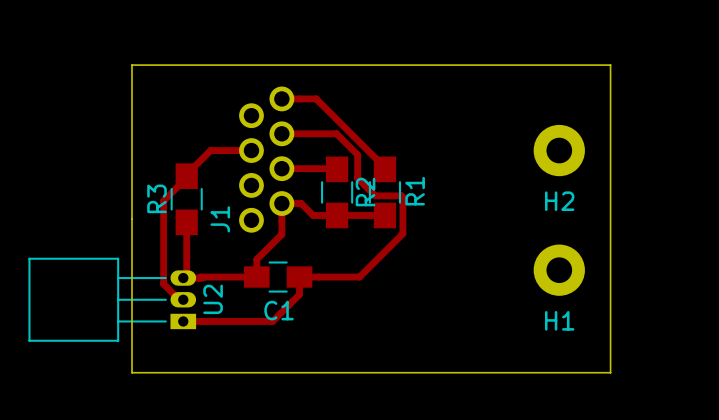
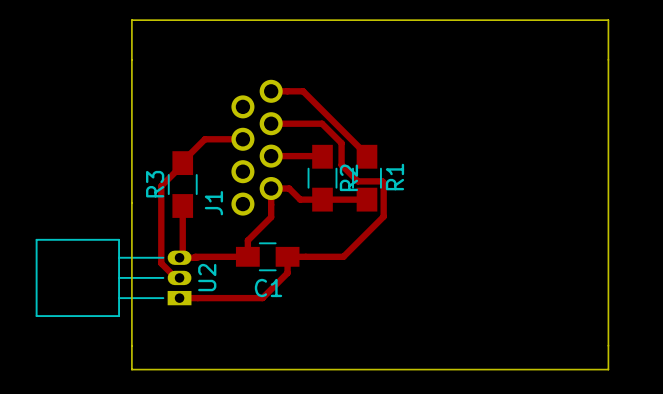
board edge: (132, 65) (610, 65) (610, 372) (132, 372) -> (131, 59) (131, 20) (608, 20) (608, 369) (131, 369) (131, 345)
H2: (559, 150) -> none
H1: (559, 270) -> none

